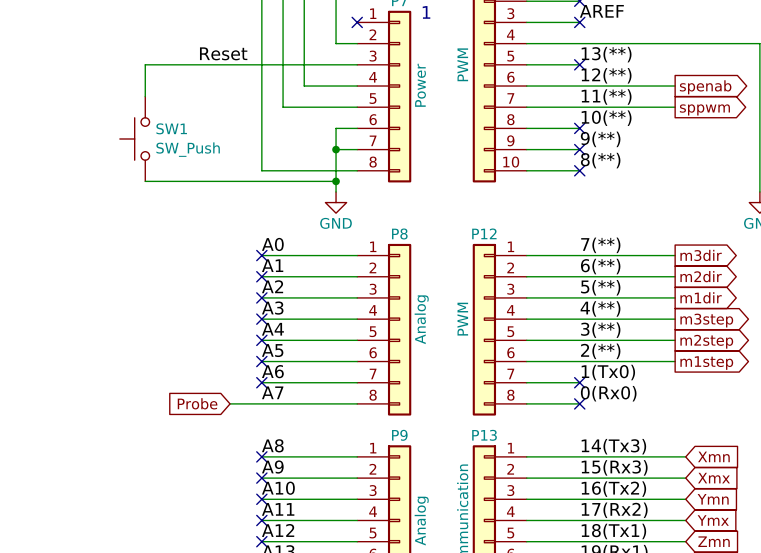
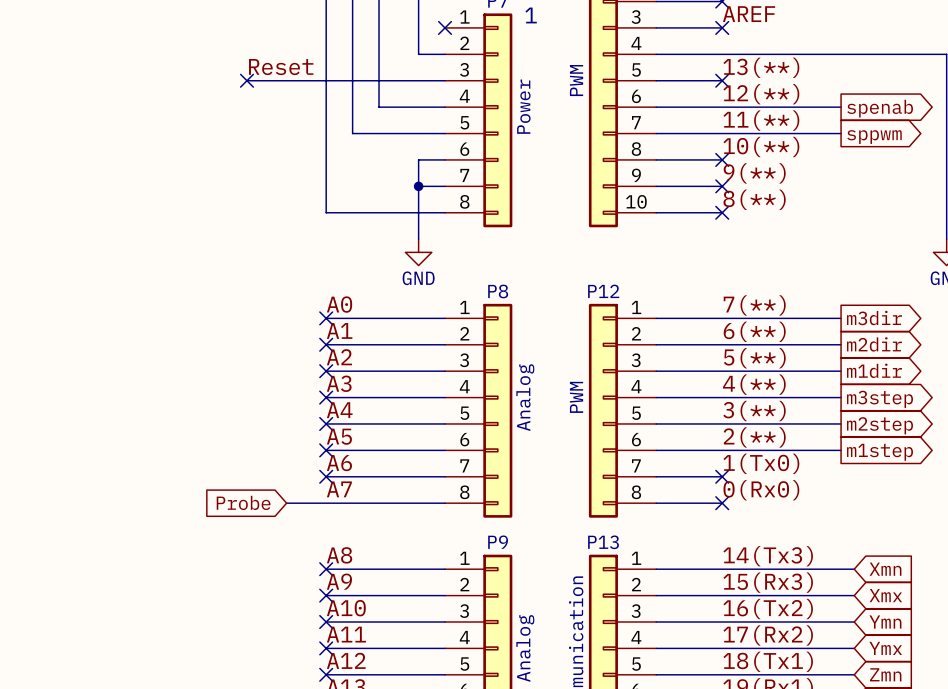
wire: (198, 64) (145, 64) (145, 96) -> none
no-connect mark: none -> (246, 80)
SW1: SW_Push (134, 138) -> none
wire: (145, 181) (336, 181) -> none
junction: (336, 181) -> none

